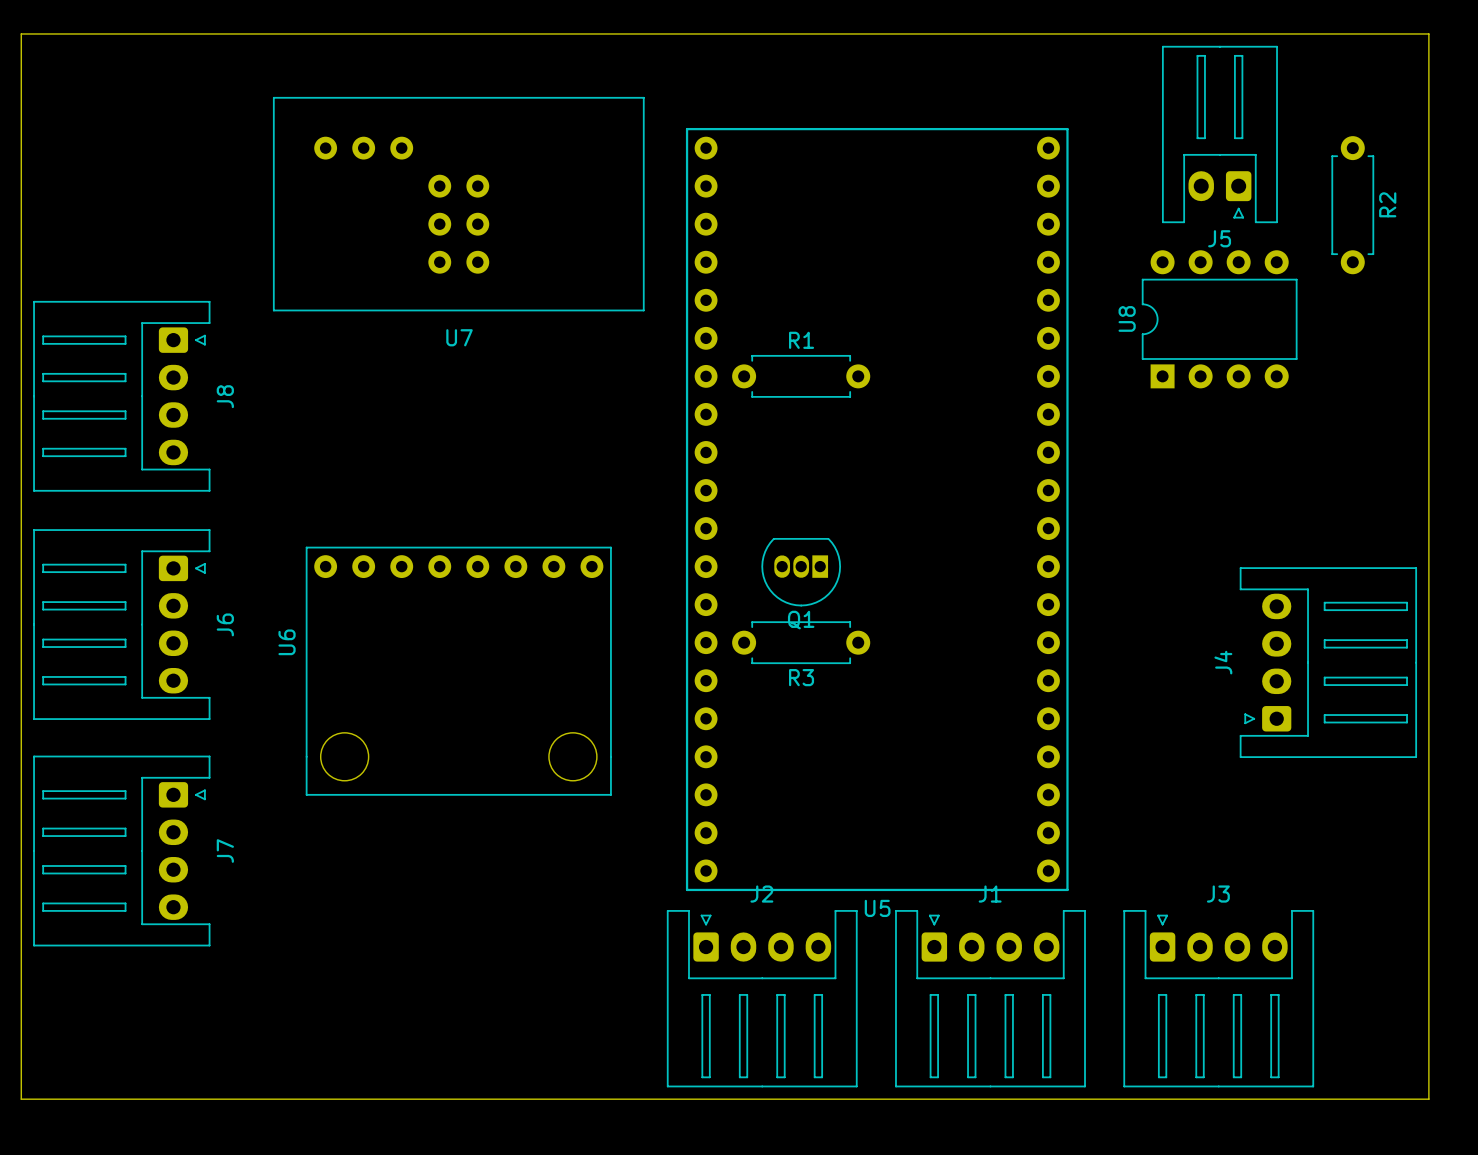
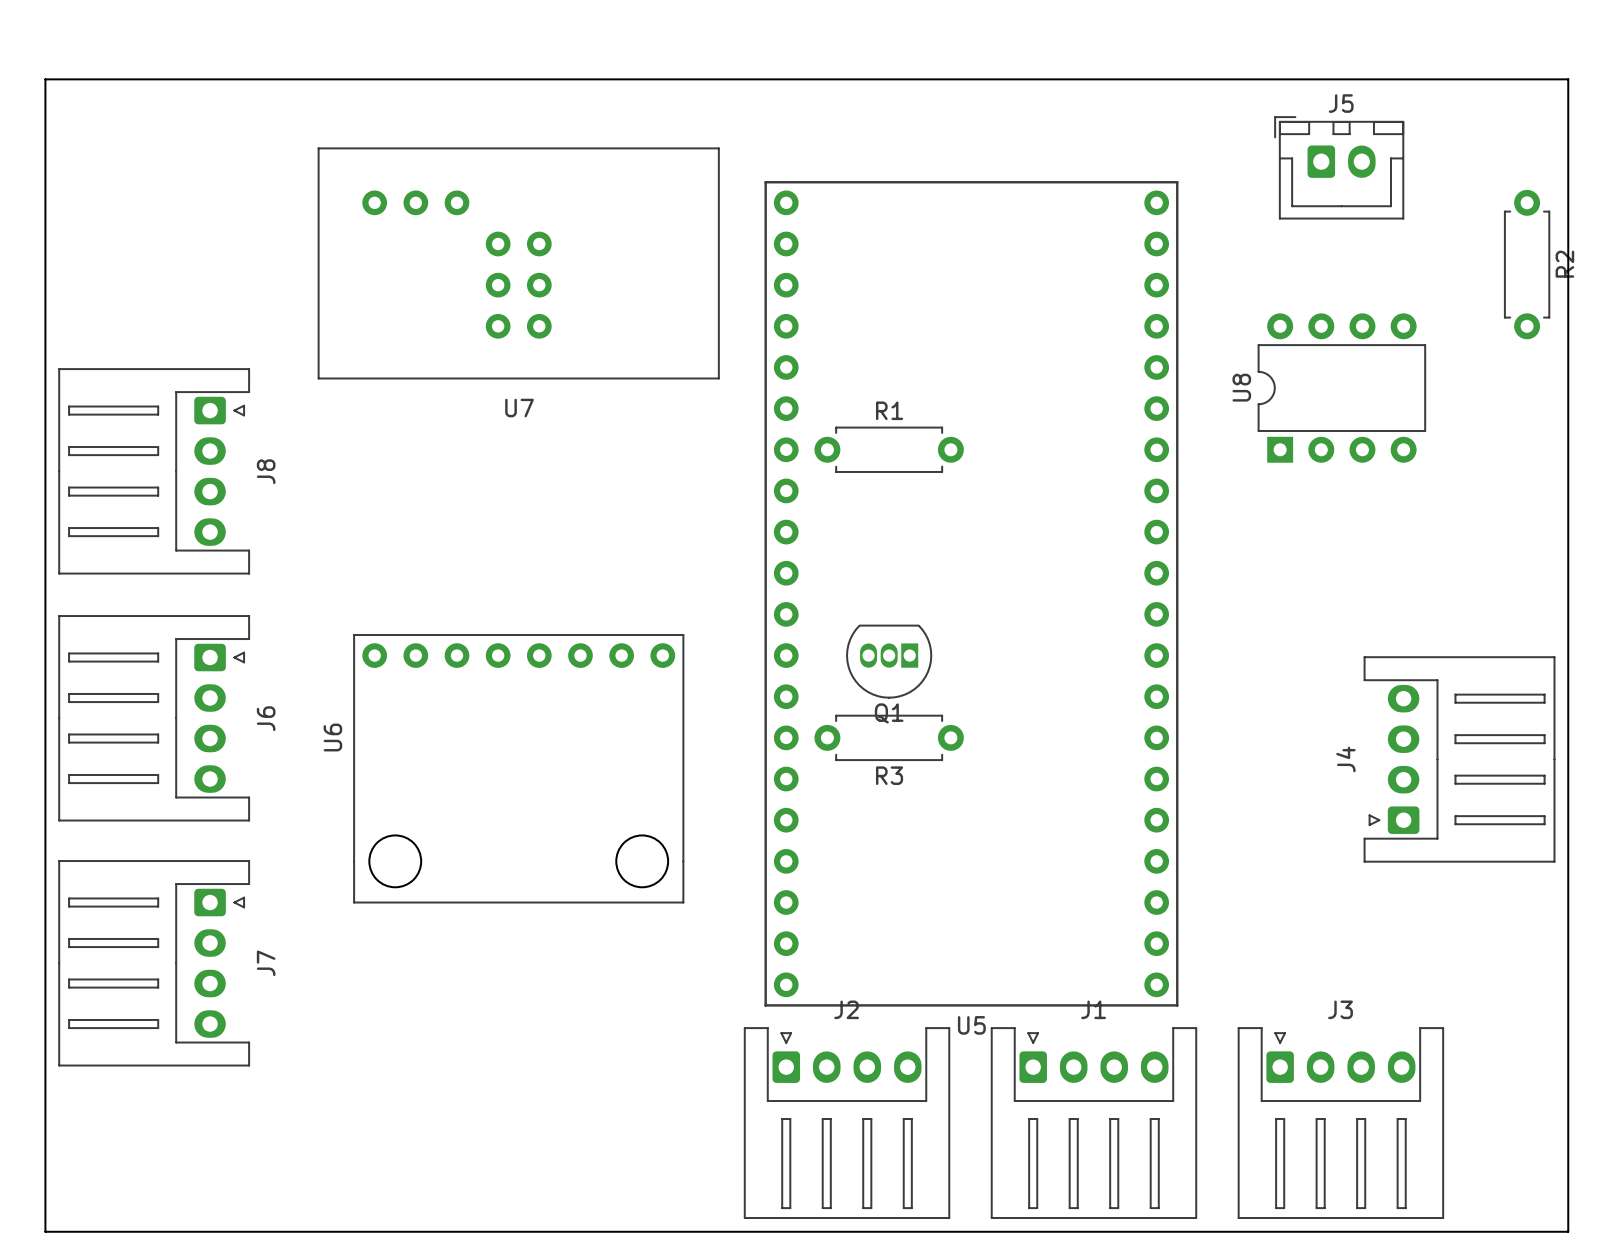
J5 footprint: [1161, 45, 1278, 224] -> [1274, 116, 1405, 220]
R2 position: (1352, 205) -> (1527, 264)
J5 name position: J5 (1219, 238) -> J5 (1341, 103)

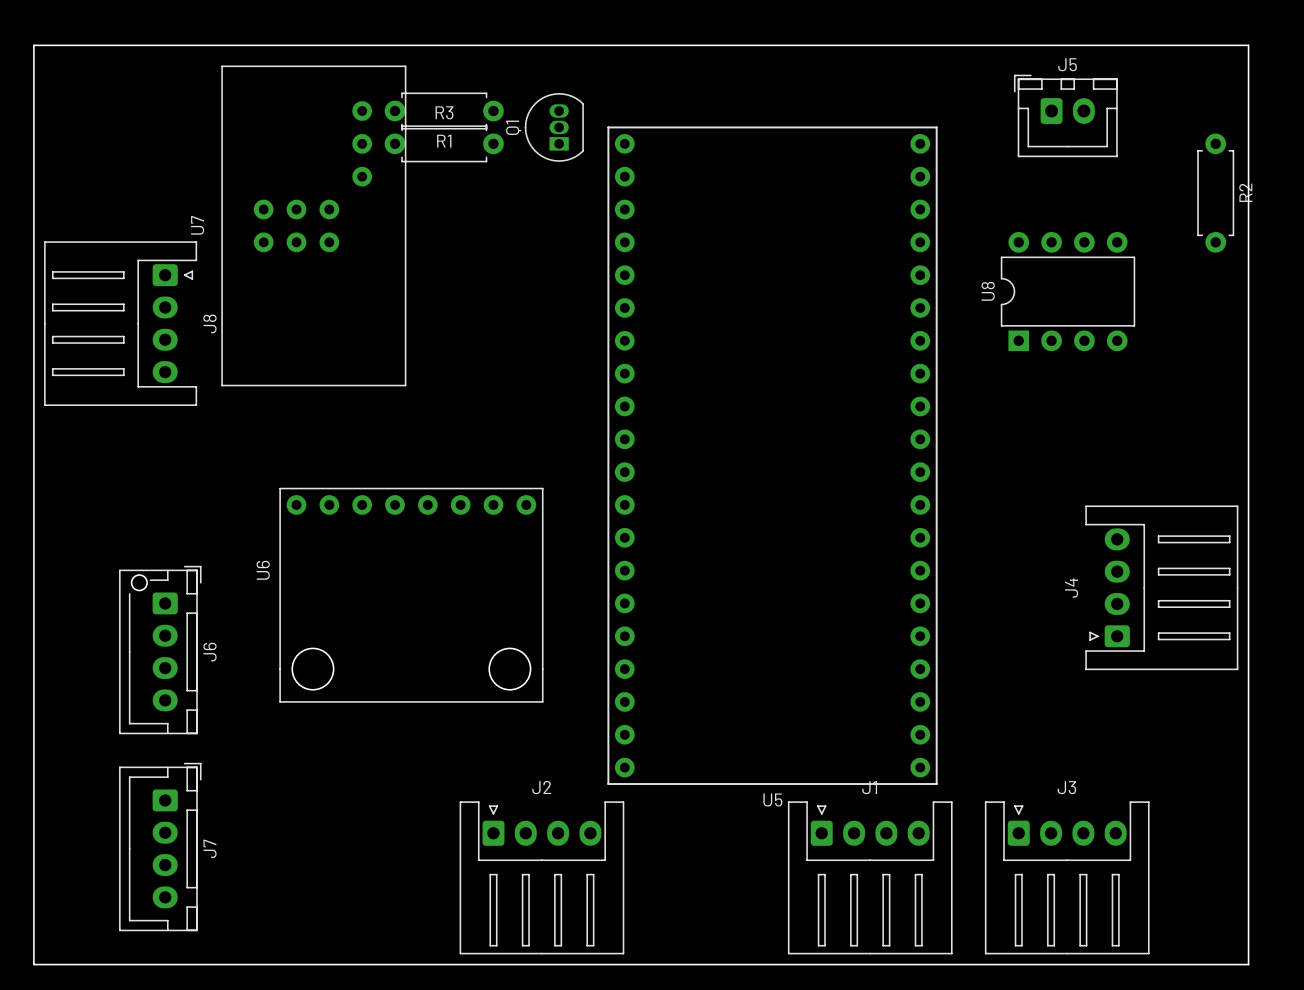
U7 rotation: 0° (518, 263) -> 90° clockwise (313, 225)
R1 name position: R1 (889, 410) -> R1 (444, 141)
R1 position: (889, 449) -> (444, 111)
J8 position: (154, 471) -> (120, 323)
J6 footprint: [58, 615, 251, 822] -> [119, 565, 202, 735]
Q1 rotation: 0° (889, 661) -> 90° clockwise (554, 127)
Q1 position: (889, 661) -> (554, 127)
J6 name position: J6 (266, 718) -> J6 (209, 652)
R3 position: (889, 737) -> (444, 143)
R3 name position: R3 (889, 775) -> R3 (444, 112)
J7 footprint: [58, 860, 251, 1067] -> [119, 762, 202, 932]
J7 name position: J7 (266, 963) -> J7 (210, 848)
J2 position: (847, 1123) -> (541, 877)

